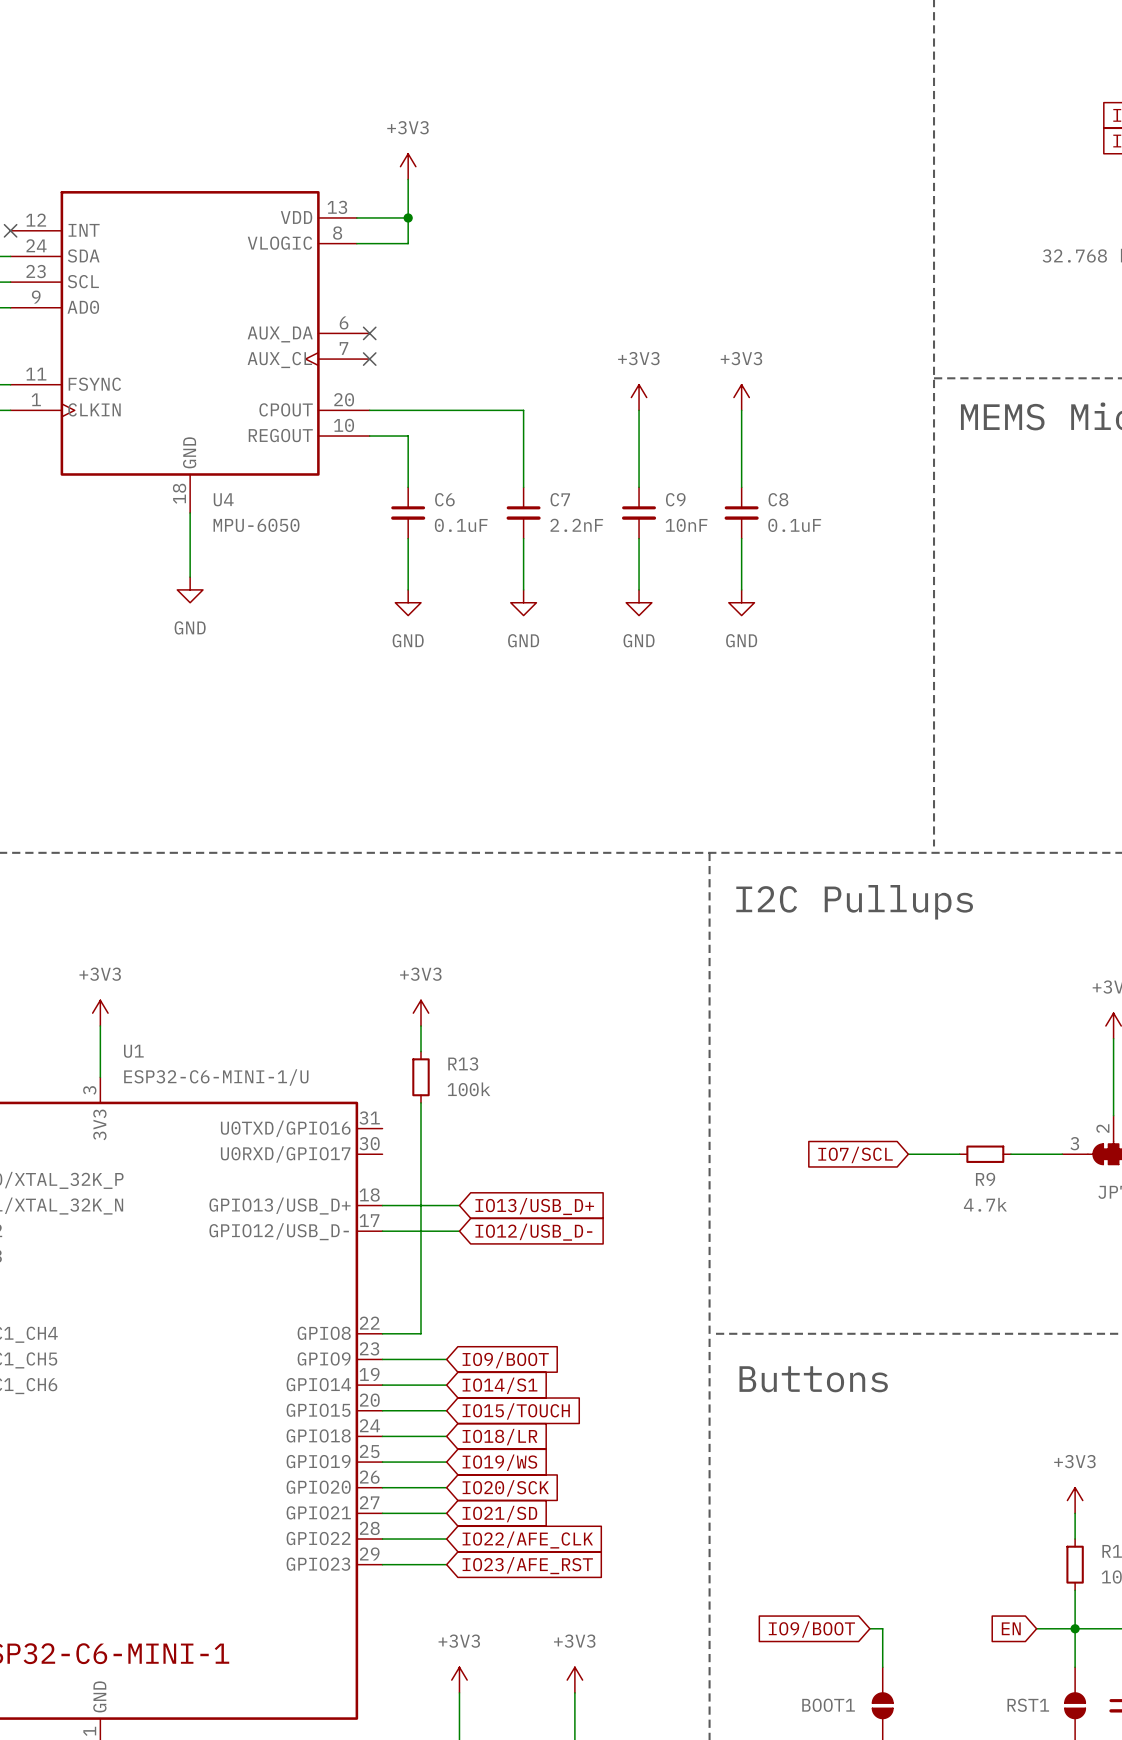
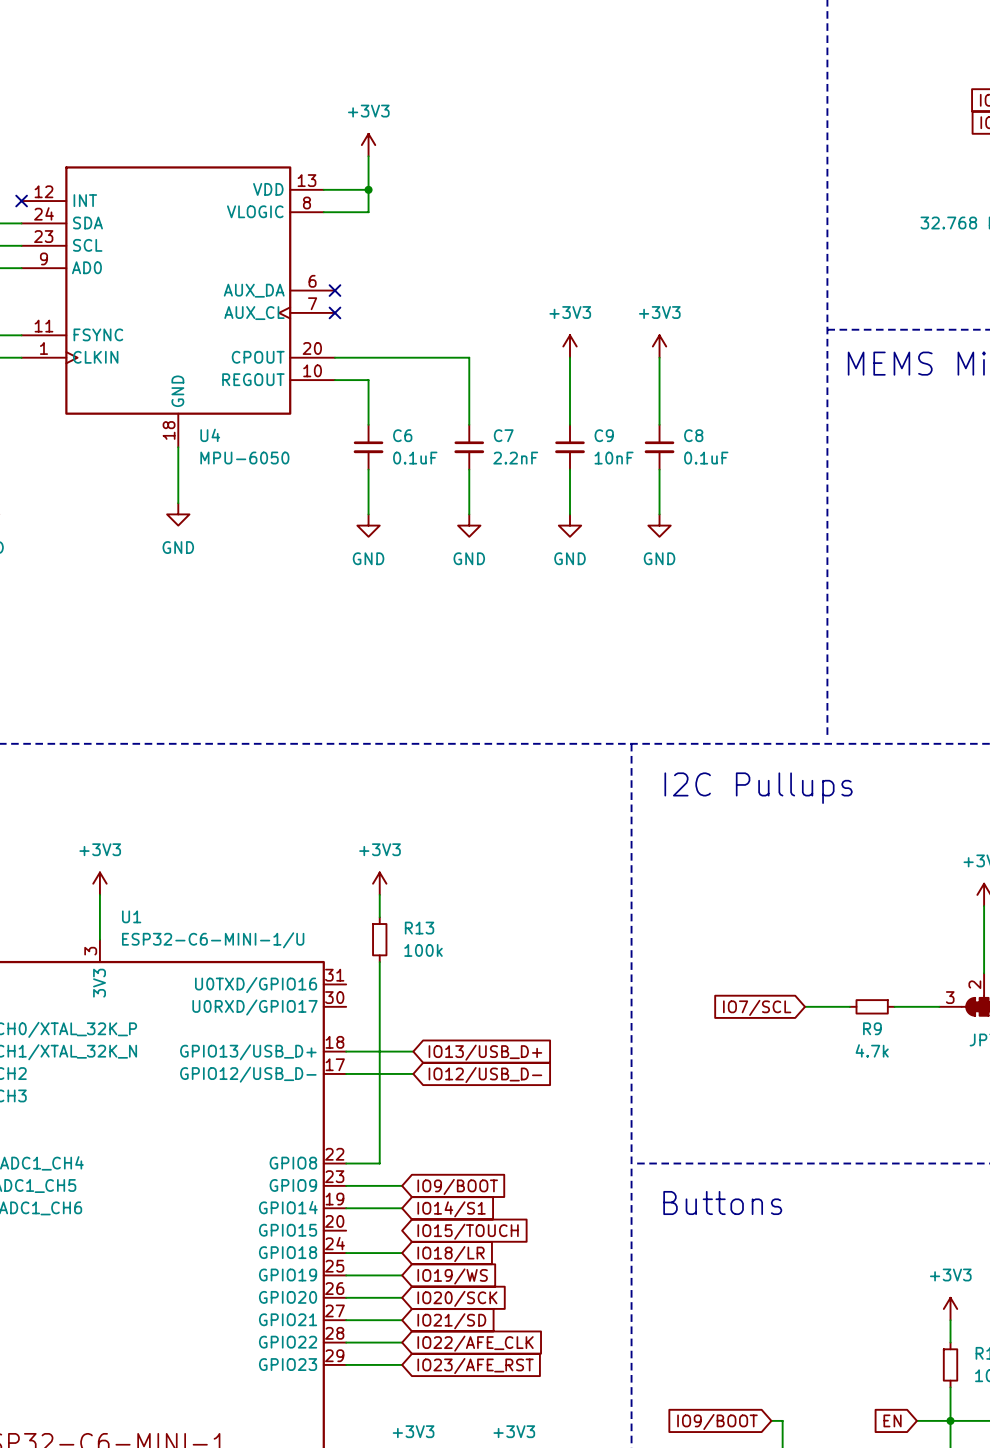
wire: (382, 1410) (446, 1410) -> none

